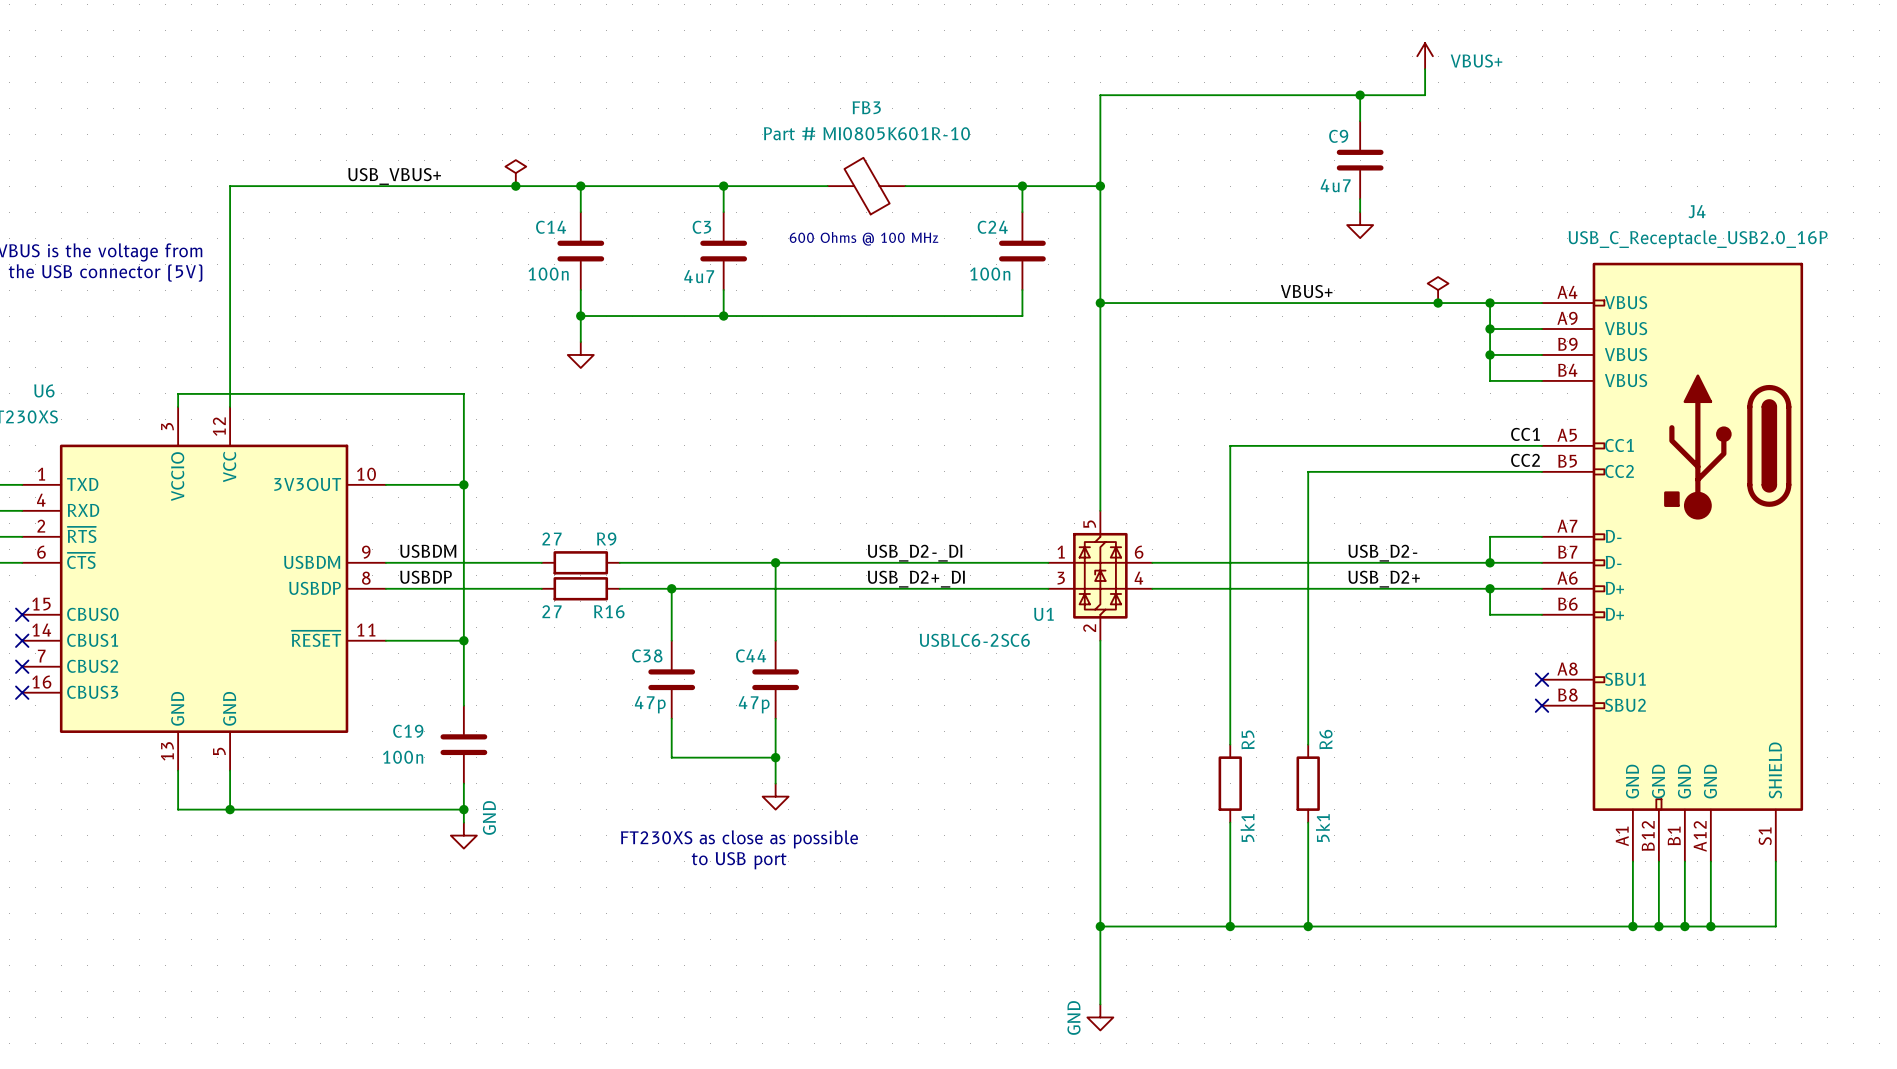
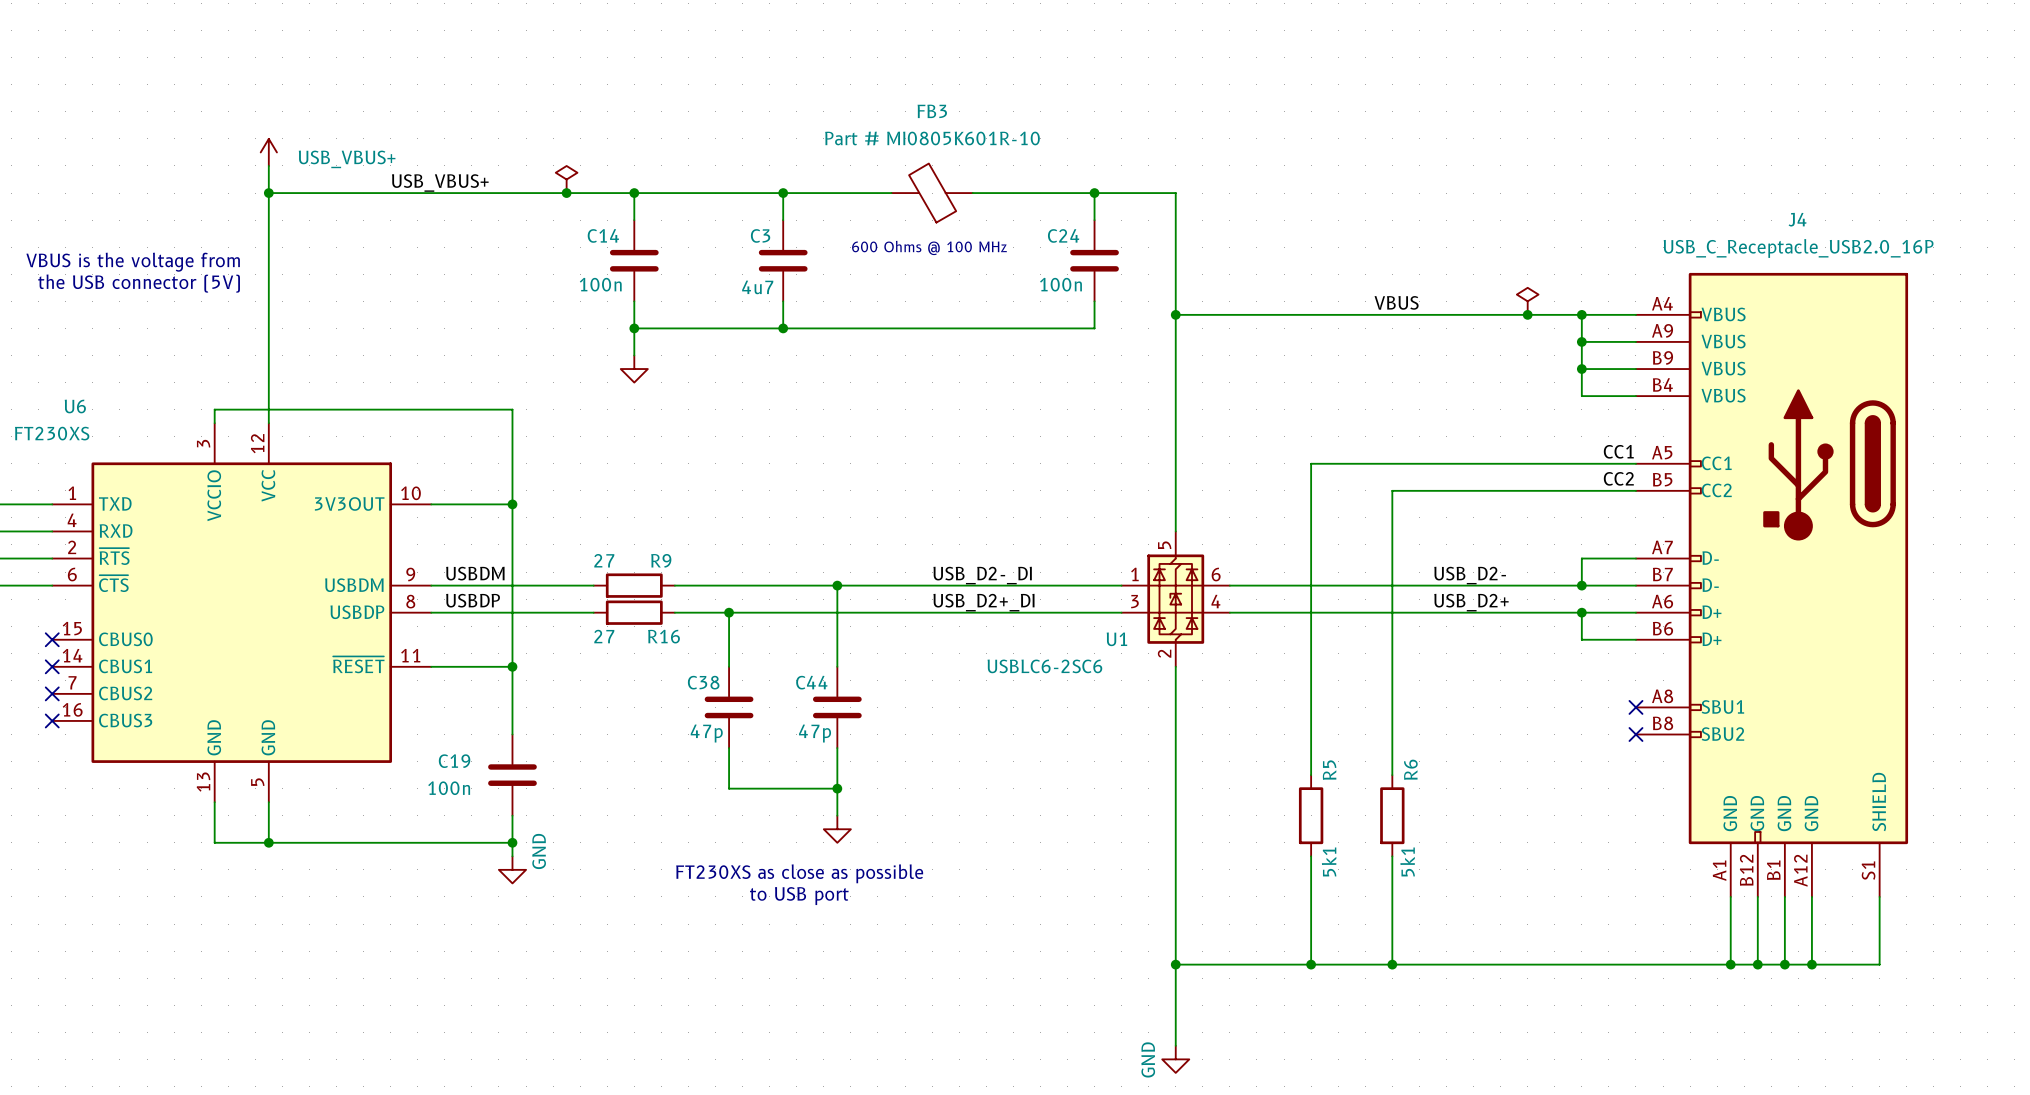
power symbol: VBUS+ (1425, 56) -> none
wire: (1425, 69) (1425, 95) (1100, 95) (1100, 186) -> none
wire: (1360, 95) (1360, 121) -> none
junction: (1360, 95) -> none
power symbol: none -> USB_VBUS+ (268, 152)
wire: none -> (268, 165) (268, 193)
C9: 4u7 (1360, 160) -> none
junction: none -> (268, 193)
junction: (1100, 186) -> none
wire: (1360, 199) (1360, 212) -> none
power symbol: (1360, 225) -> none
label: VBUS+ (1306, 291) -> VBUS (1396, 302)

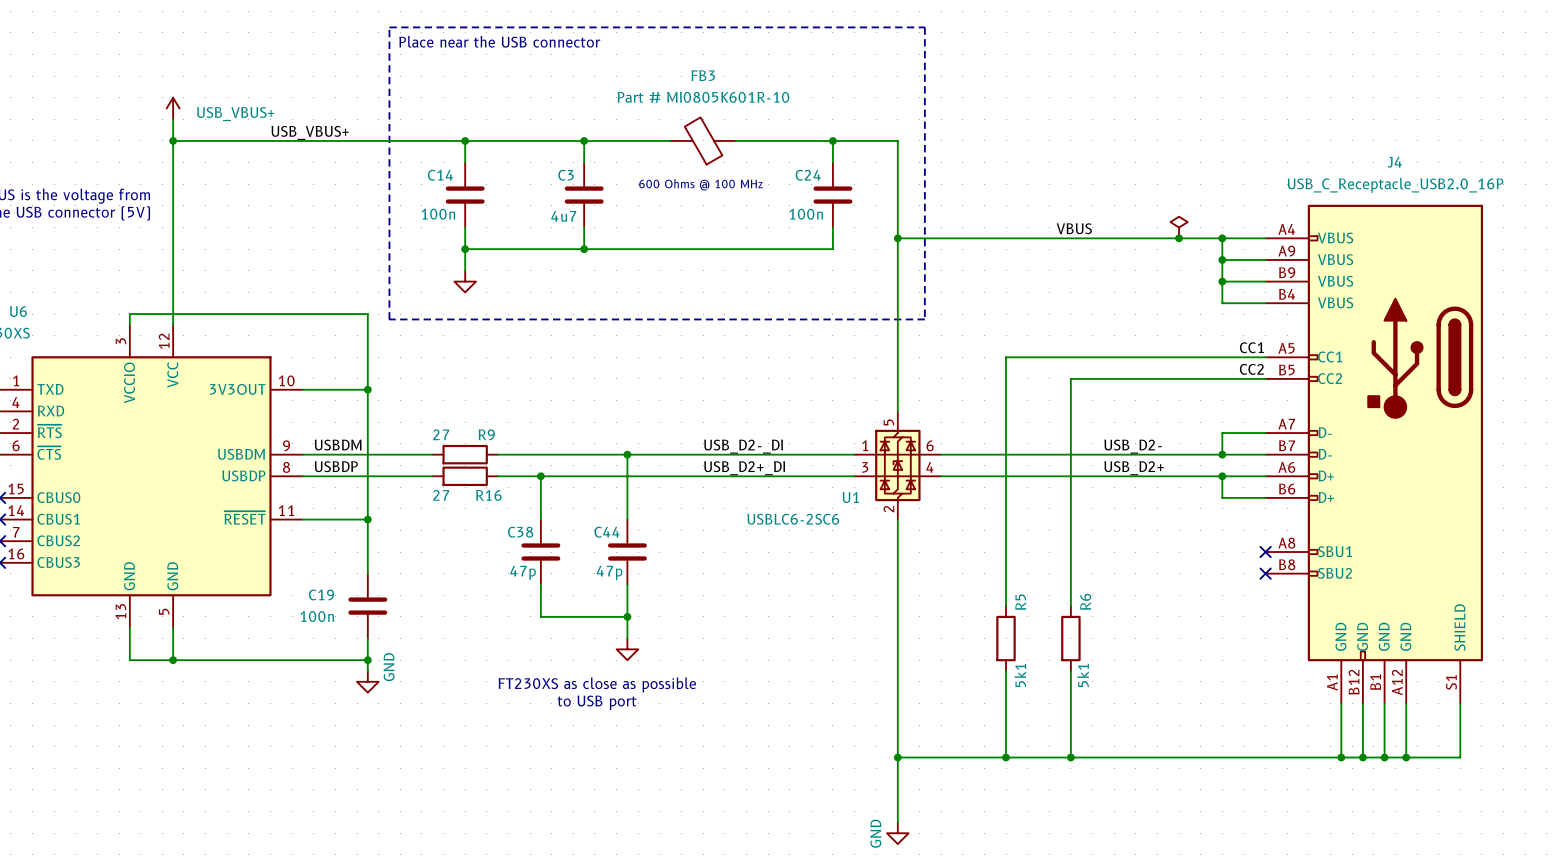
line: none -> (389, 27) (924, 27) (924, 319) (389, 319) (389, 27)
text: none -> Place near the USB connector (499, 41)
power symbol: (566, 179) -> none
junction: (566, 193) -> none

